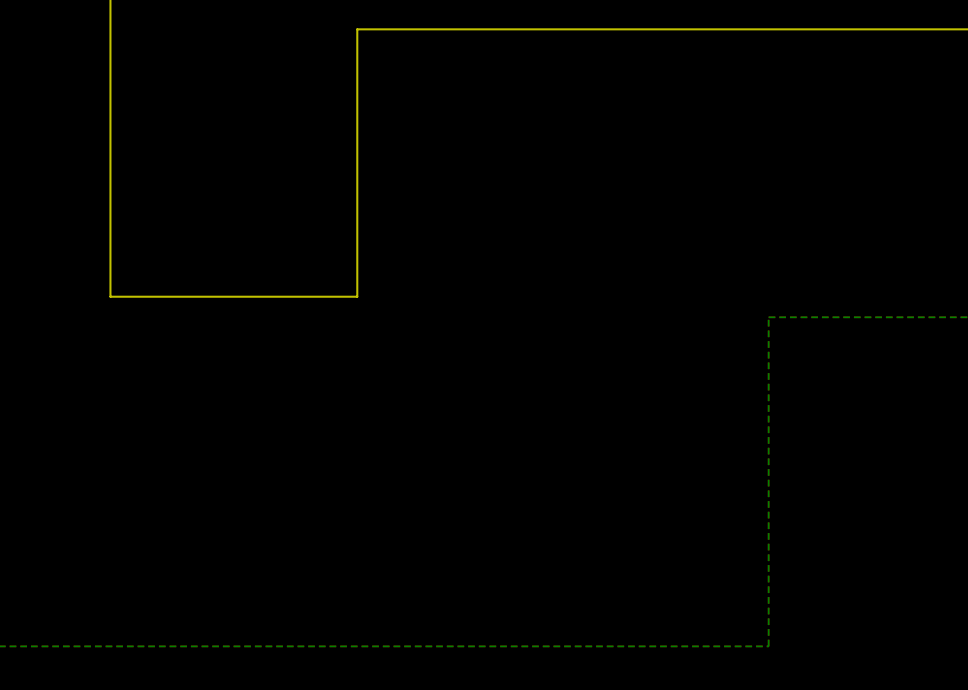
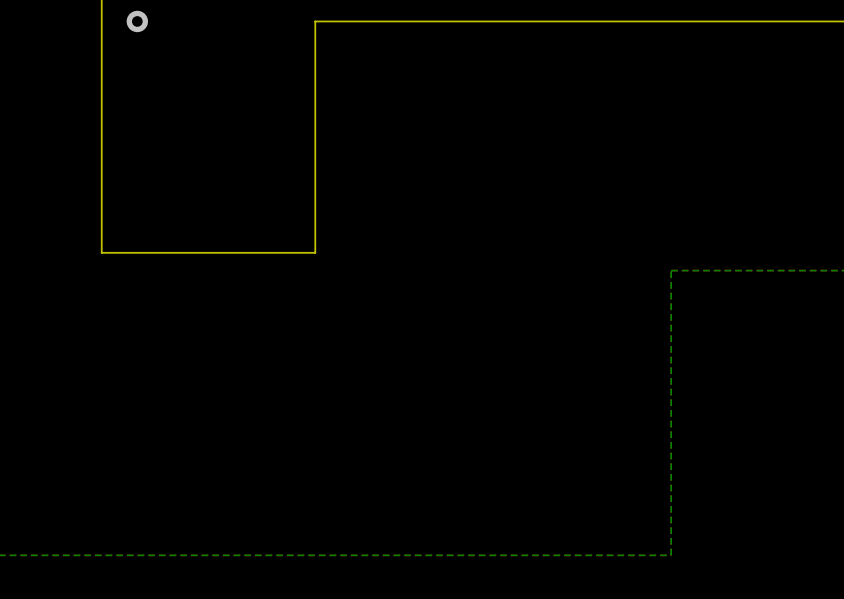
via: none -> (137, 21)

